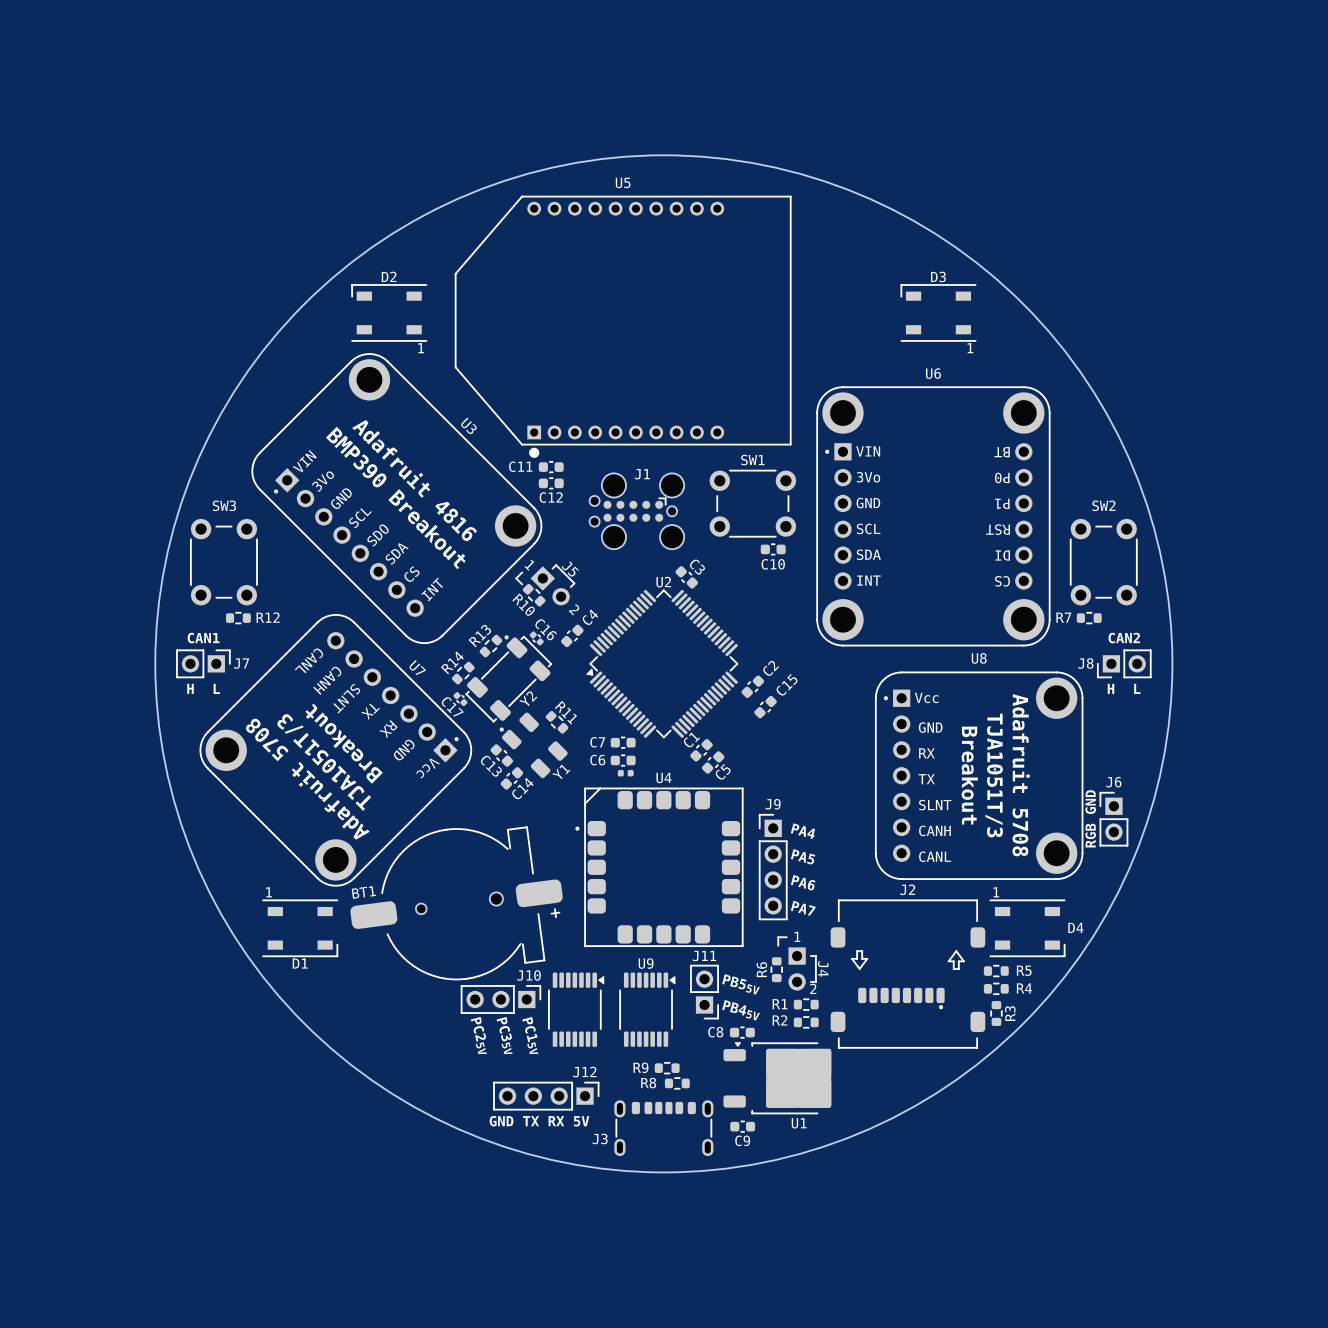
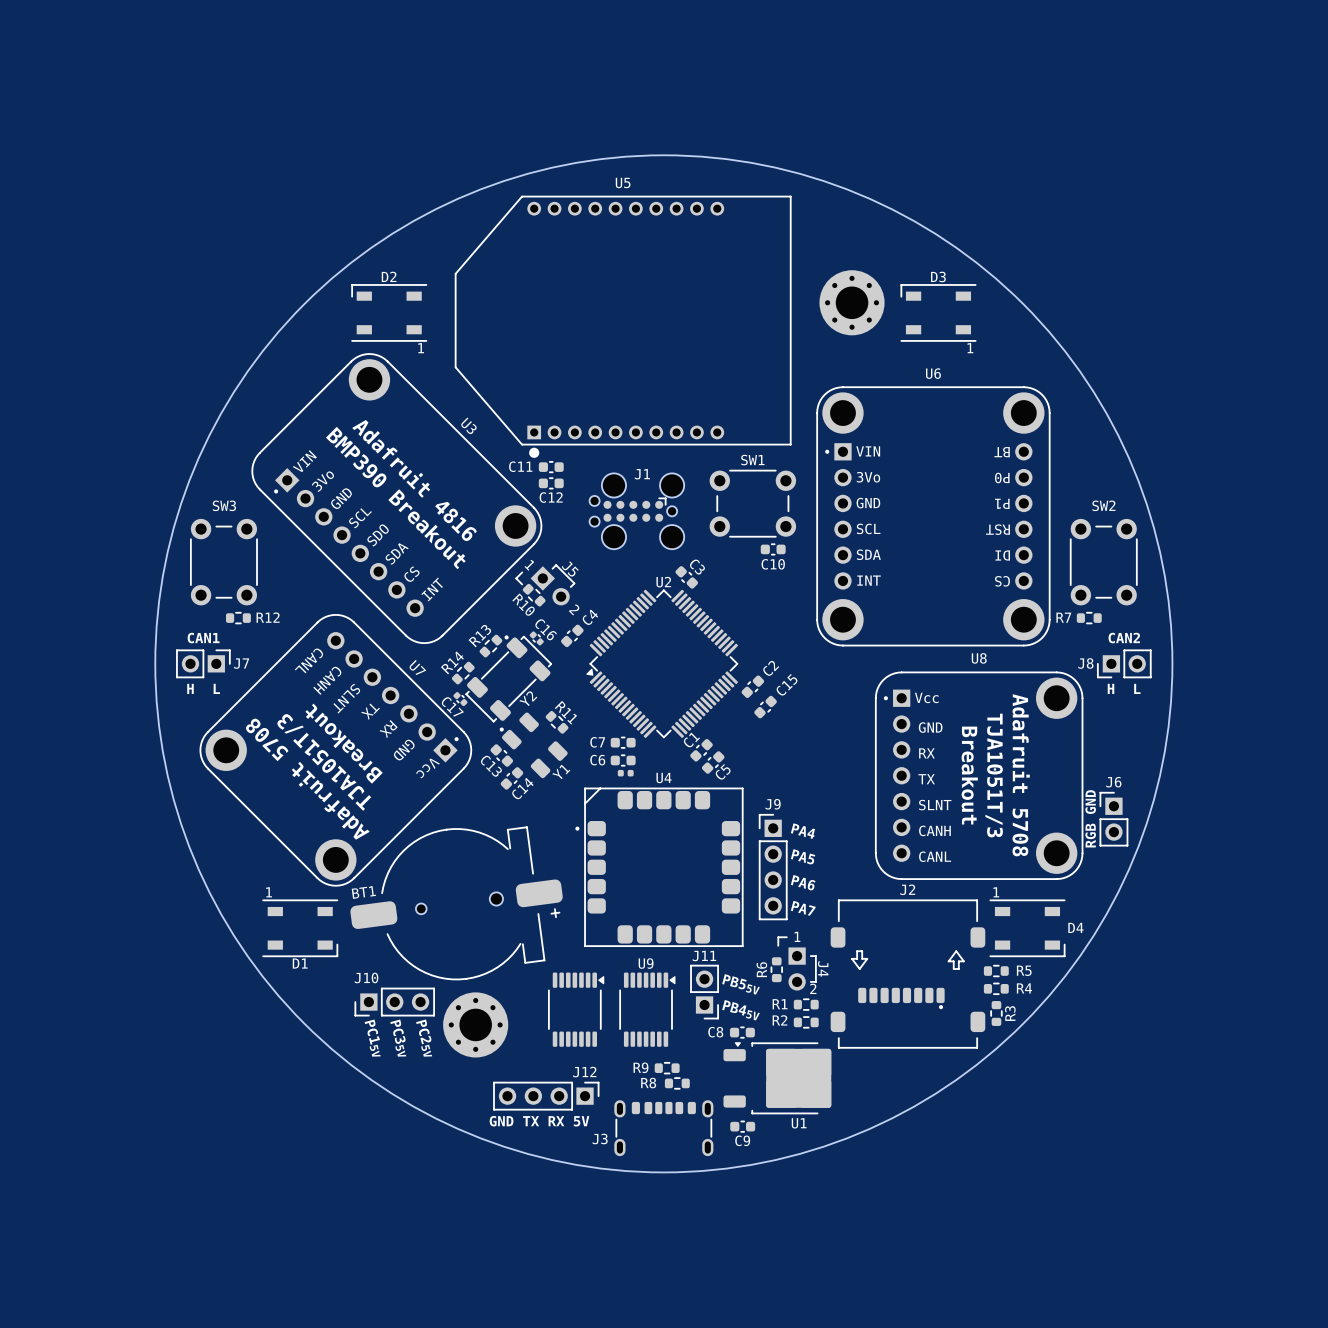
part: none -> (852, 302)
J10 name position: J10 (529, 975) -> J10 (366, 977)
J10 rotation: 0° (500, 999) -> 180° (394, 1002)
J10 position: (500, 999) -> (394, 1002)
part: none -> (475, 1024)
text position: PC25V (478, 1035) -> PC25V (424, 1038)
text position: PC35V (504, 1035) -> PC35V (398, 1038)
text position: PC15V (530, 1035) -> PC15V (372, 1038)

